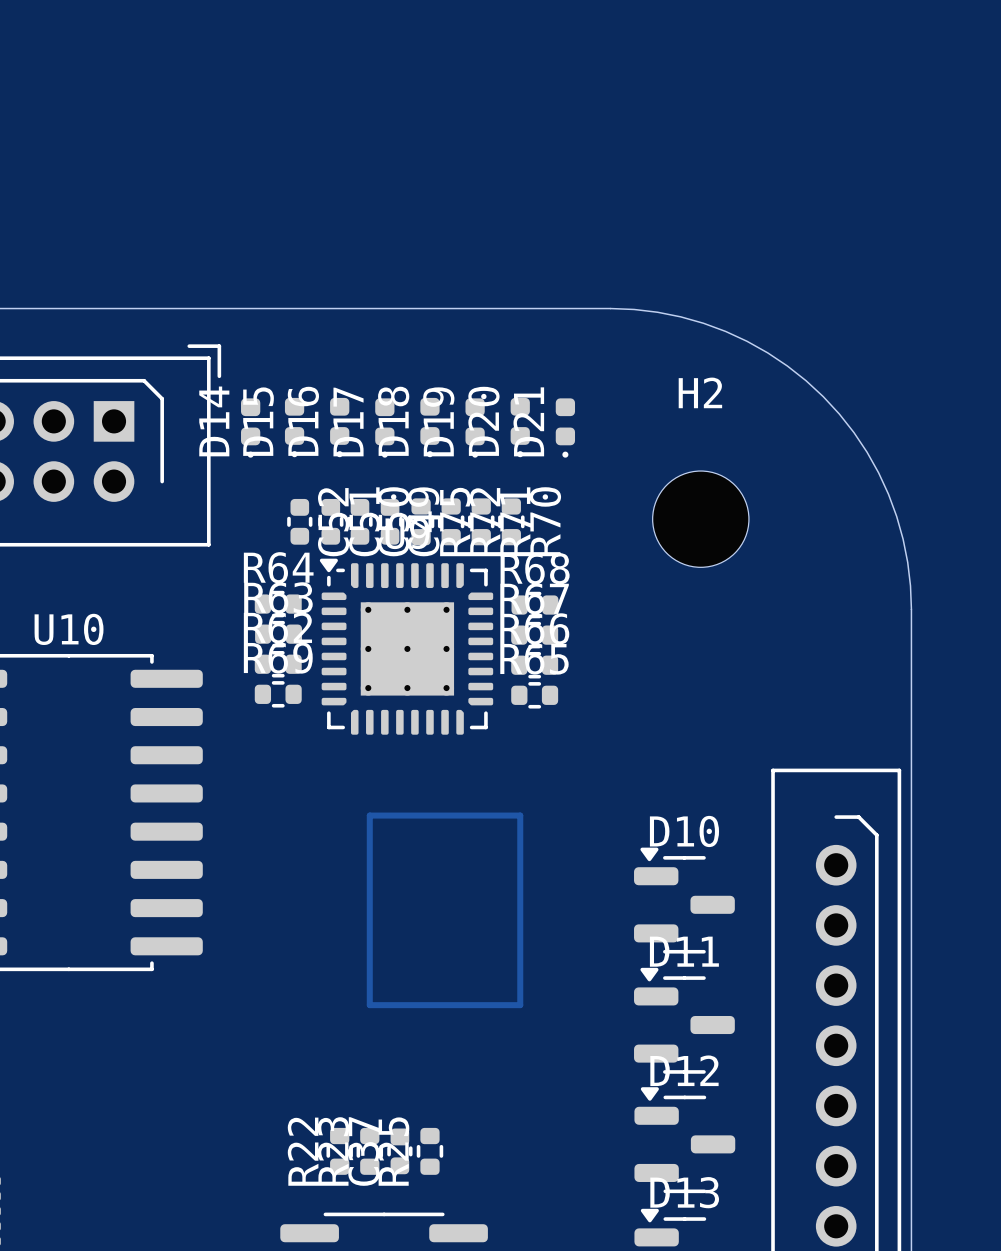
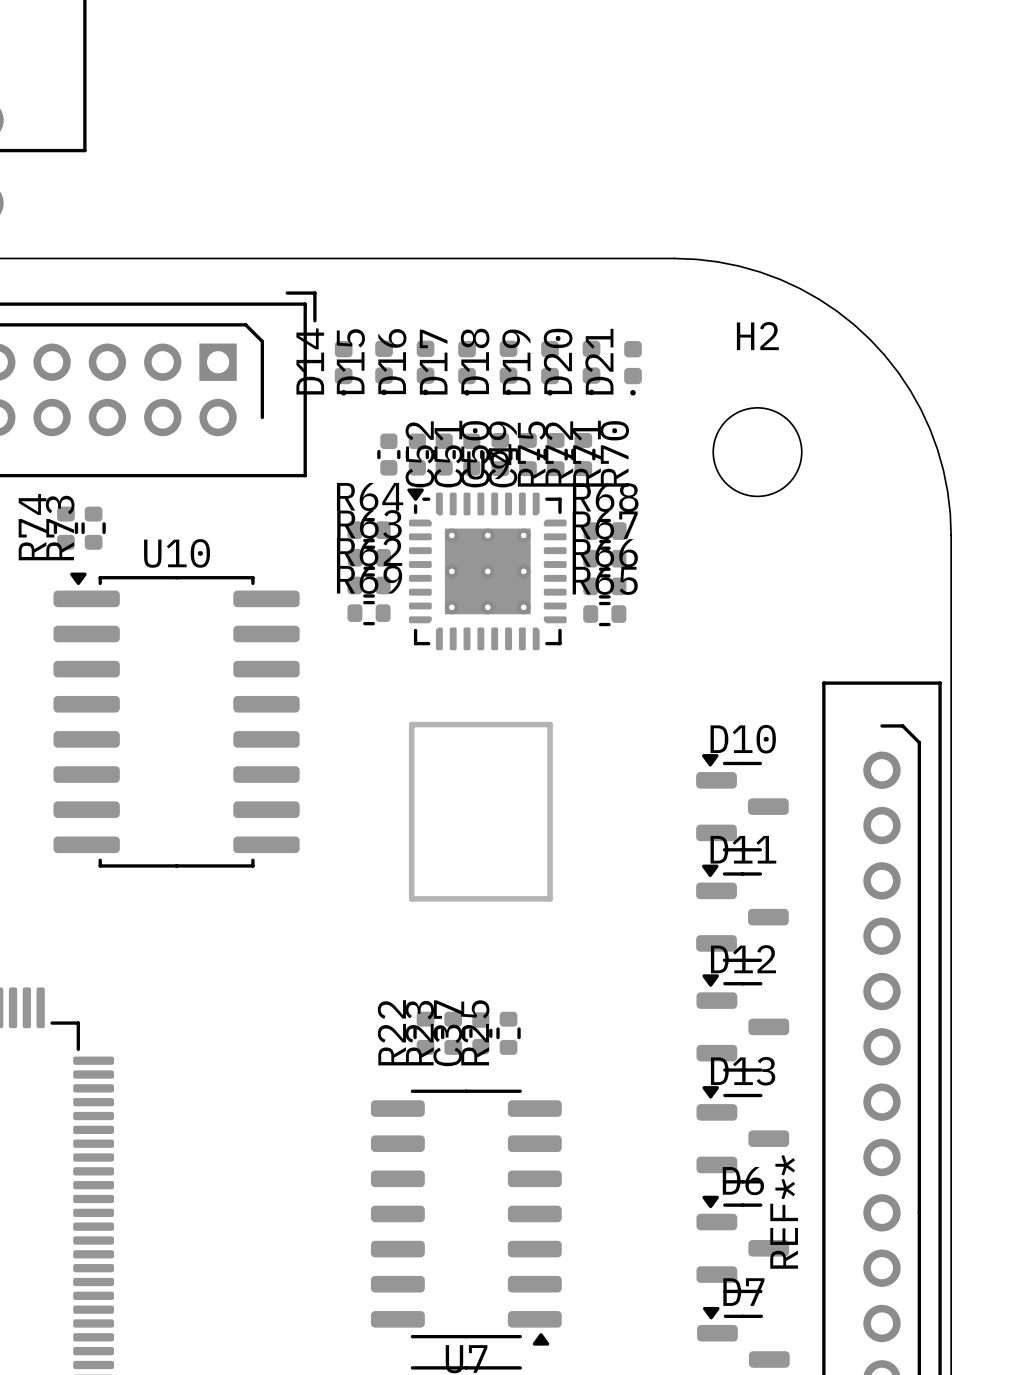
track: (369, 815) (369, 1005) -> (453, 724) (411, 724) (411, 898) (453, 898)
track: (475, 815) (520, 815) (520, 1005) (475, 1005) -> (550, 724) (550, 898)

